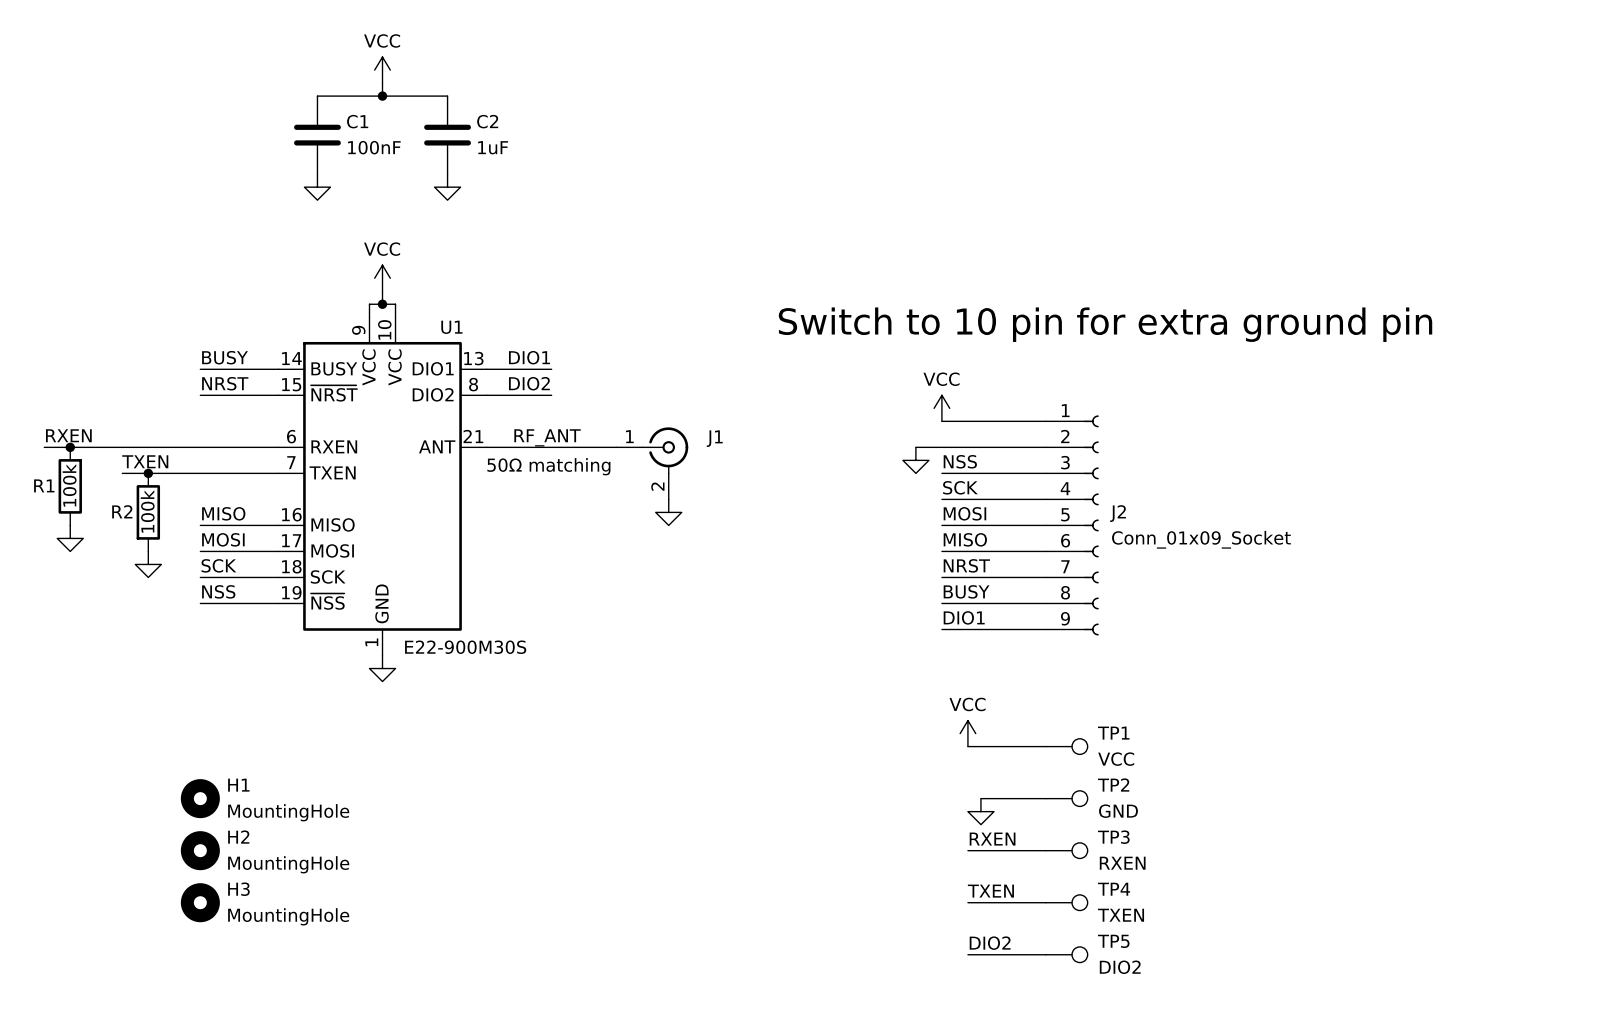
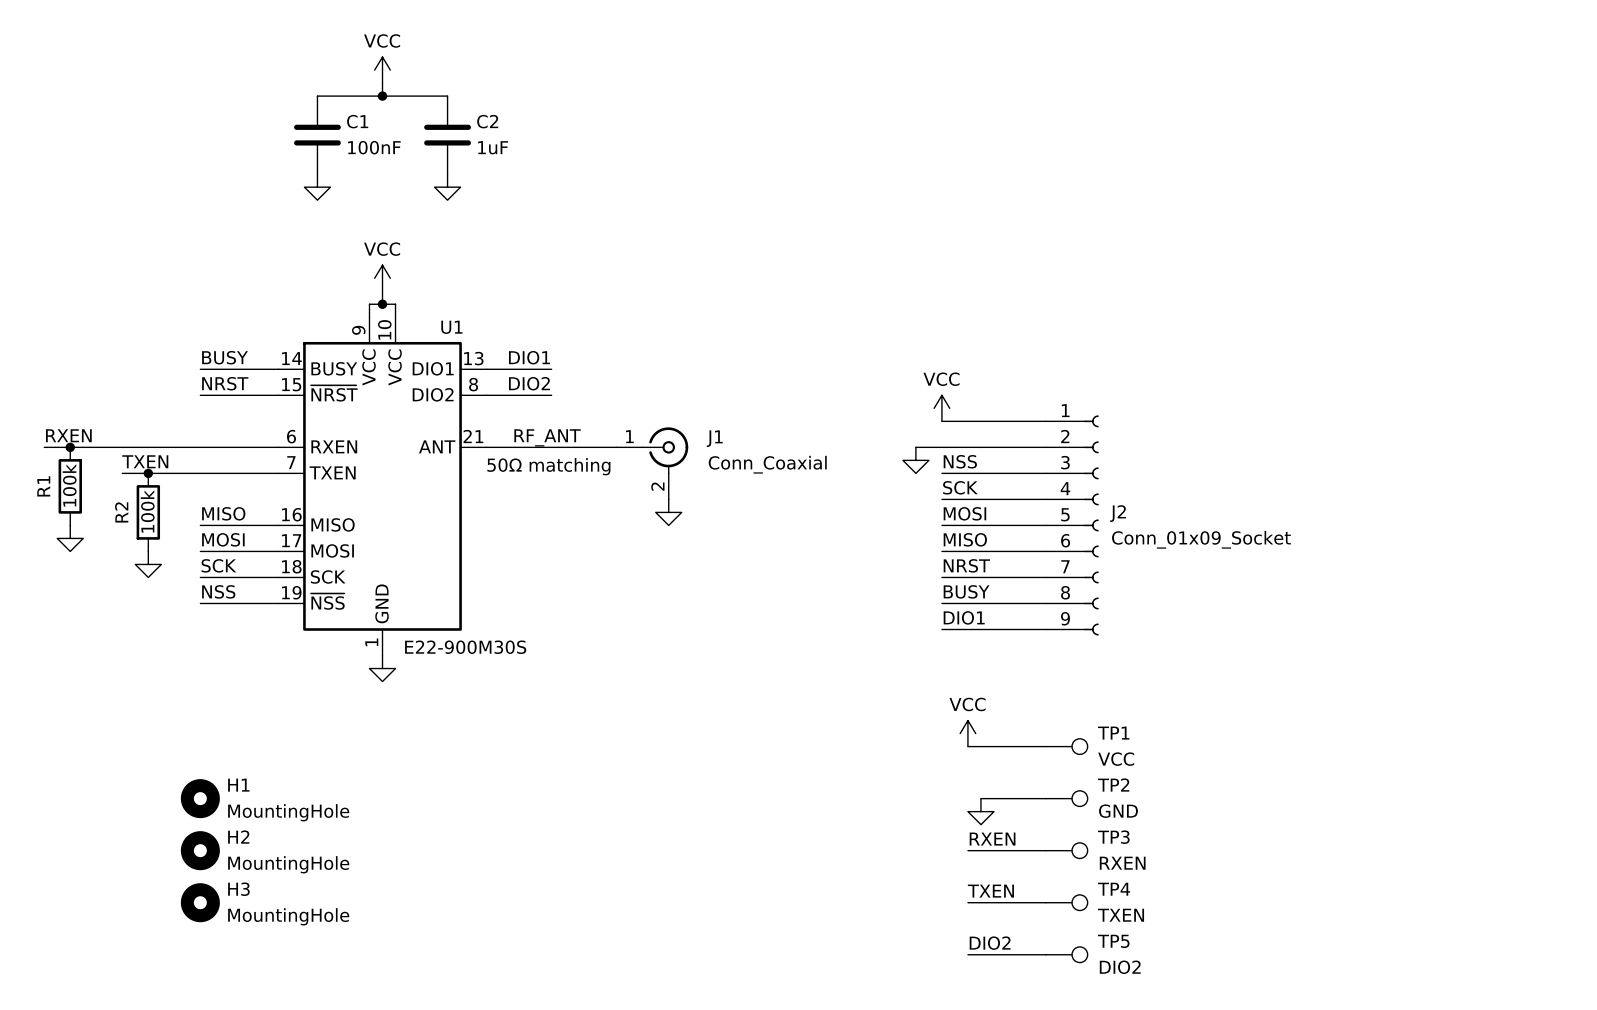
text: Switch to 10 pin for extra ground pin (1105, 324) -> none
J1 value: none -> Conn_Coaxial (767, 464)
R1 name rotation: 0° (44, 485) -> 90° counterclockwise (43, 486)
R2 name rotation: 0° (122, 511) -> 90° counterclockwise (121, 512)

